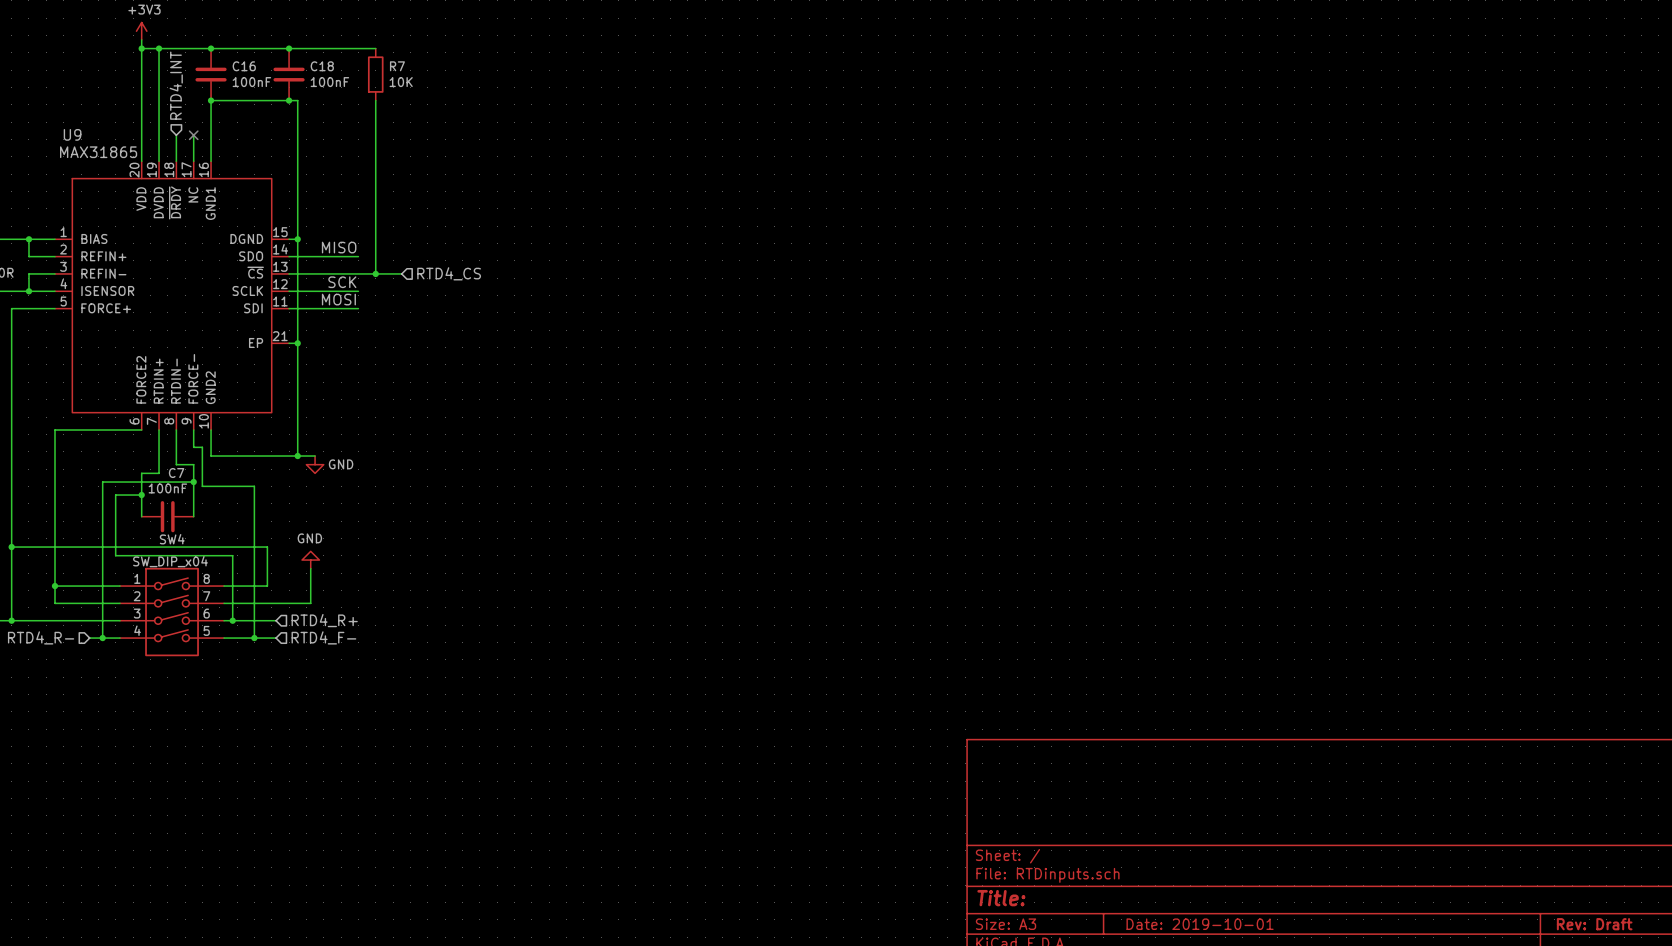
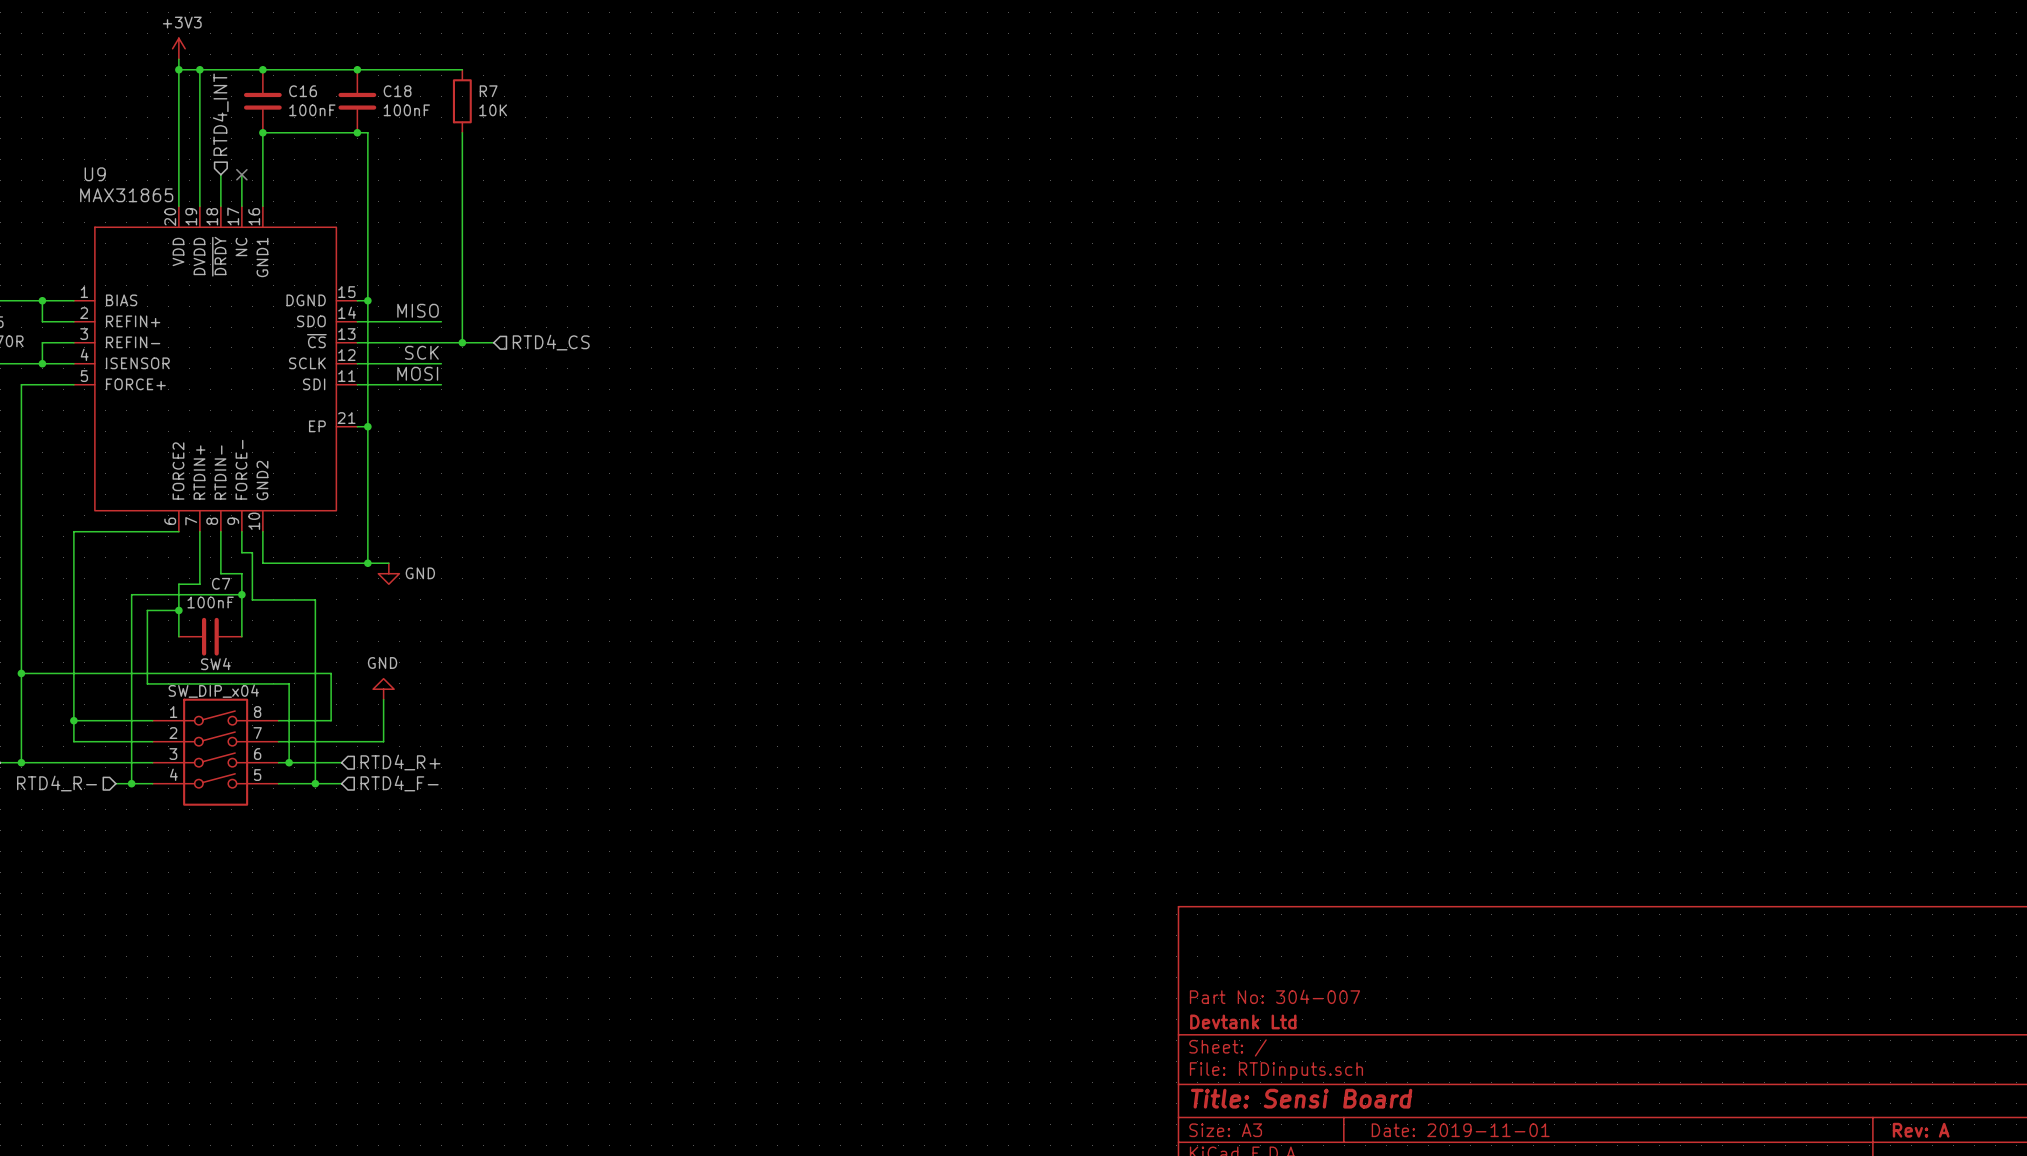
title block: none -> Part No: 304-007 (1274, 996)
title block: none -> Devtank Ltd (1243, 1021)
title block: Title: (1001, 898) -> Title: Sensi Board (1301, 1098)
title block: Date: 2019-10-01 (1200, 924) -> Date: 2019-11-01 (1460, 1130)
title block: Rev: Draft (1594, 924) -> Rev: A (1921, 1130)

